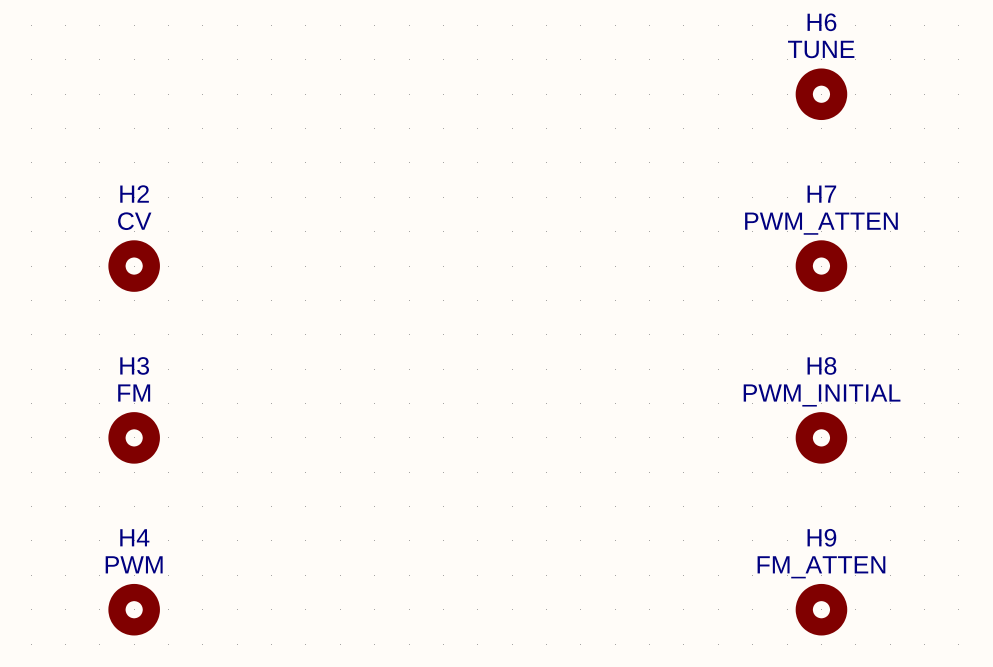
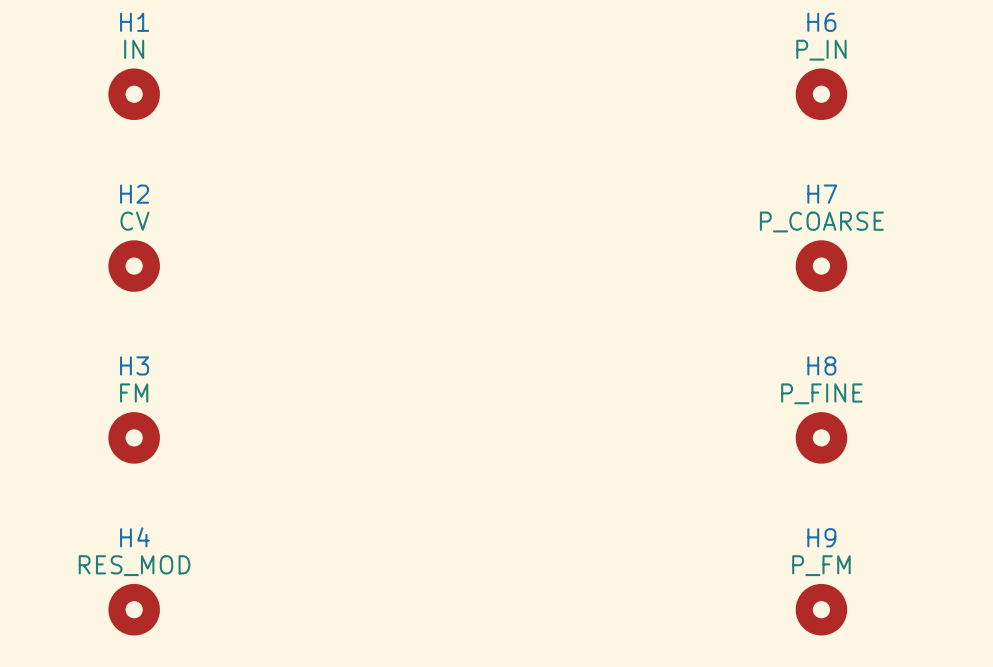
H6 value: TUNE (821, 49) -> P_IN (821, 50)
H1: none -> IN (134, 94)
H7 value: PWM_ATTEN (821, 223) -> P_COARSE (821, 222)
H8 value: PWM_INITIAL (822, 395) -> P_FINE (821, 393)
H4 value: PWM (134, 564) -> RES_MOD (134, 565)
H9 value: FM_ATTEN (821, 567) -> P_FM (821, 565)

